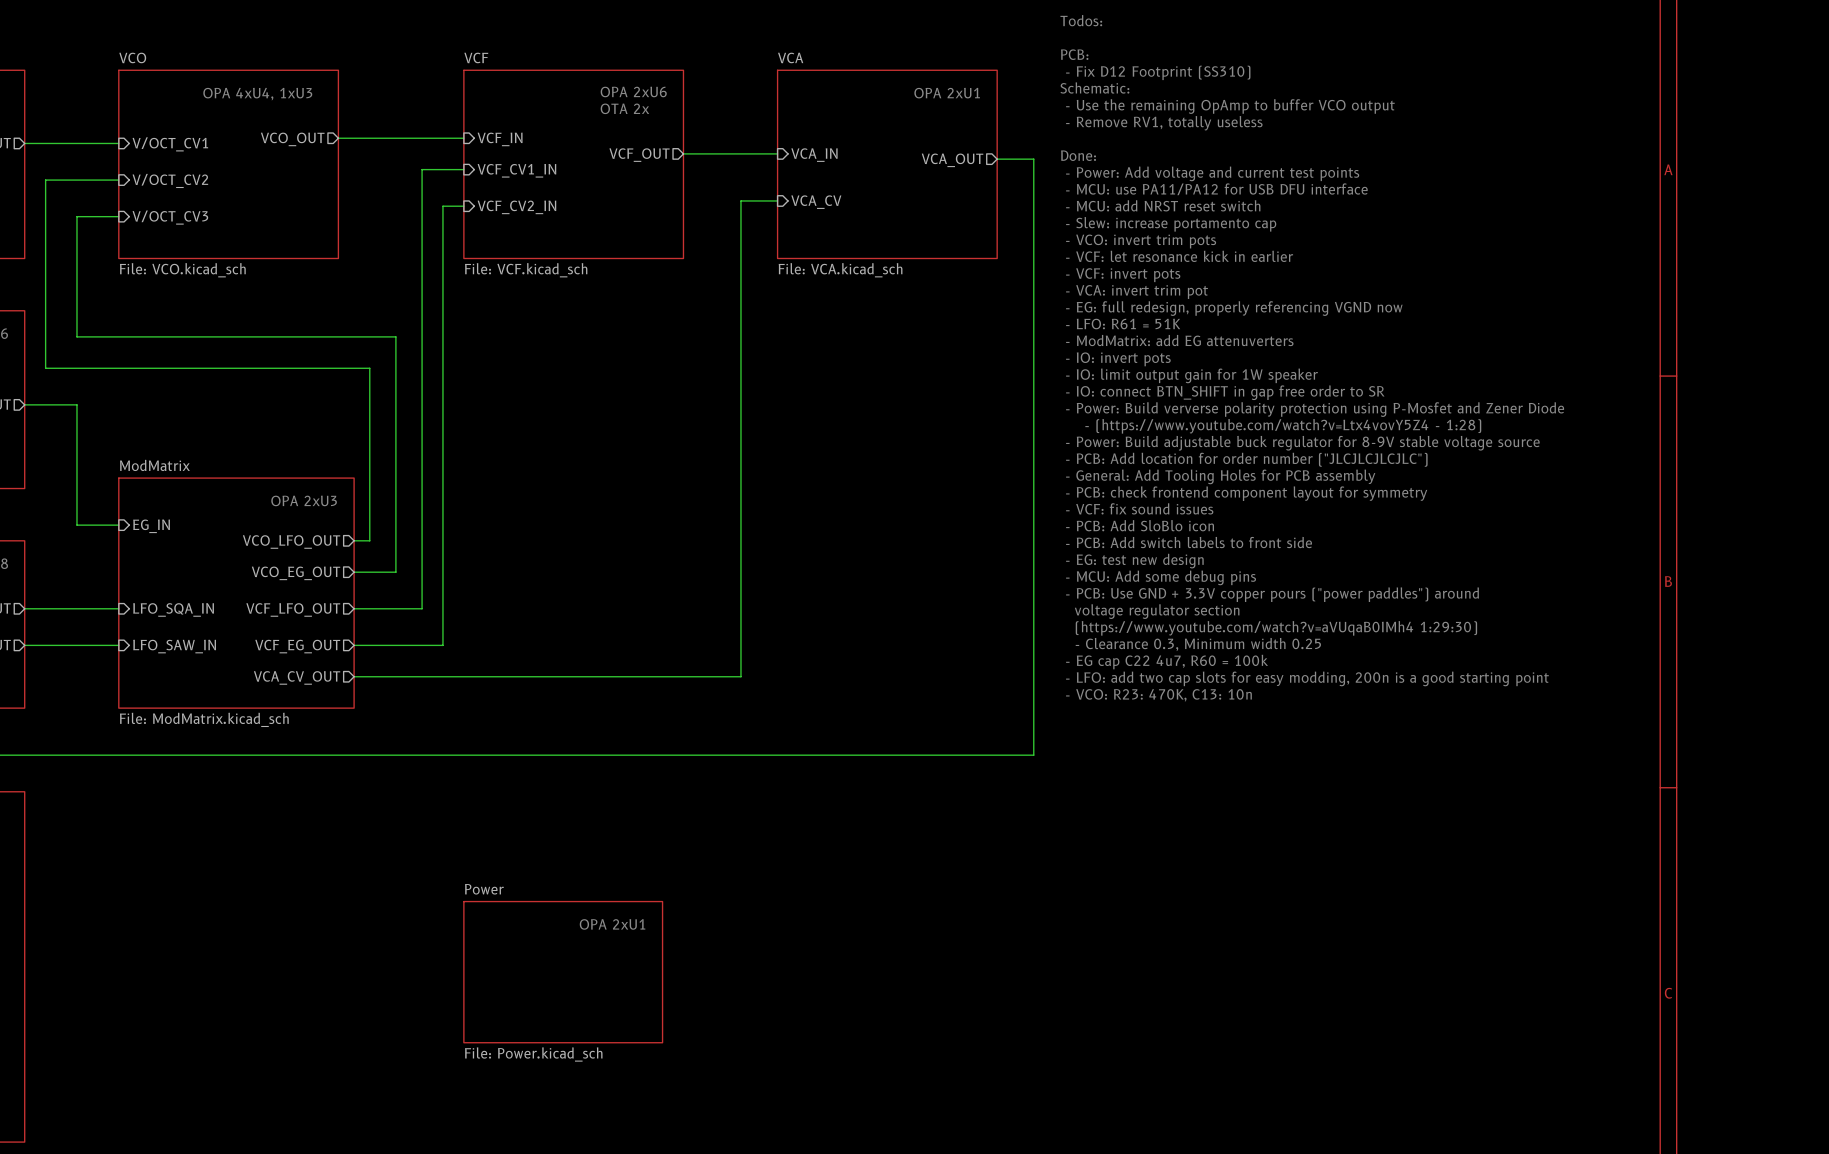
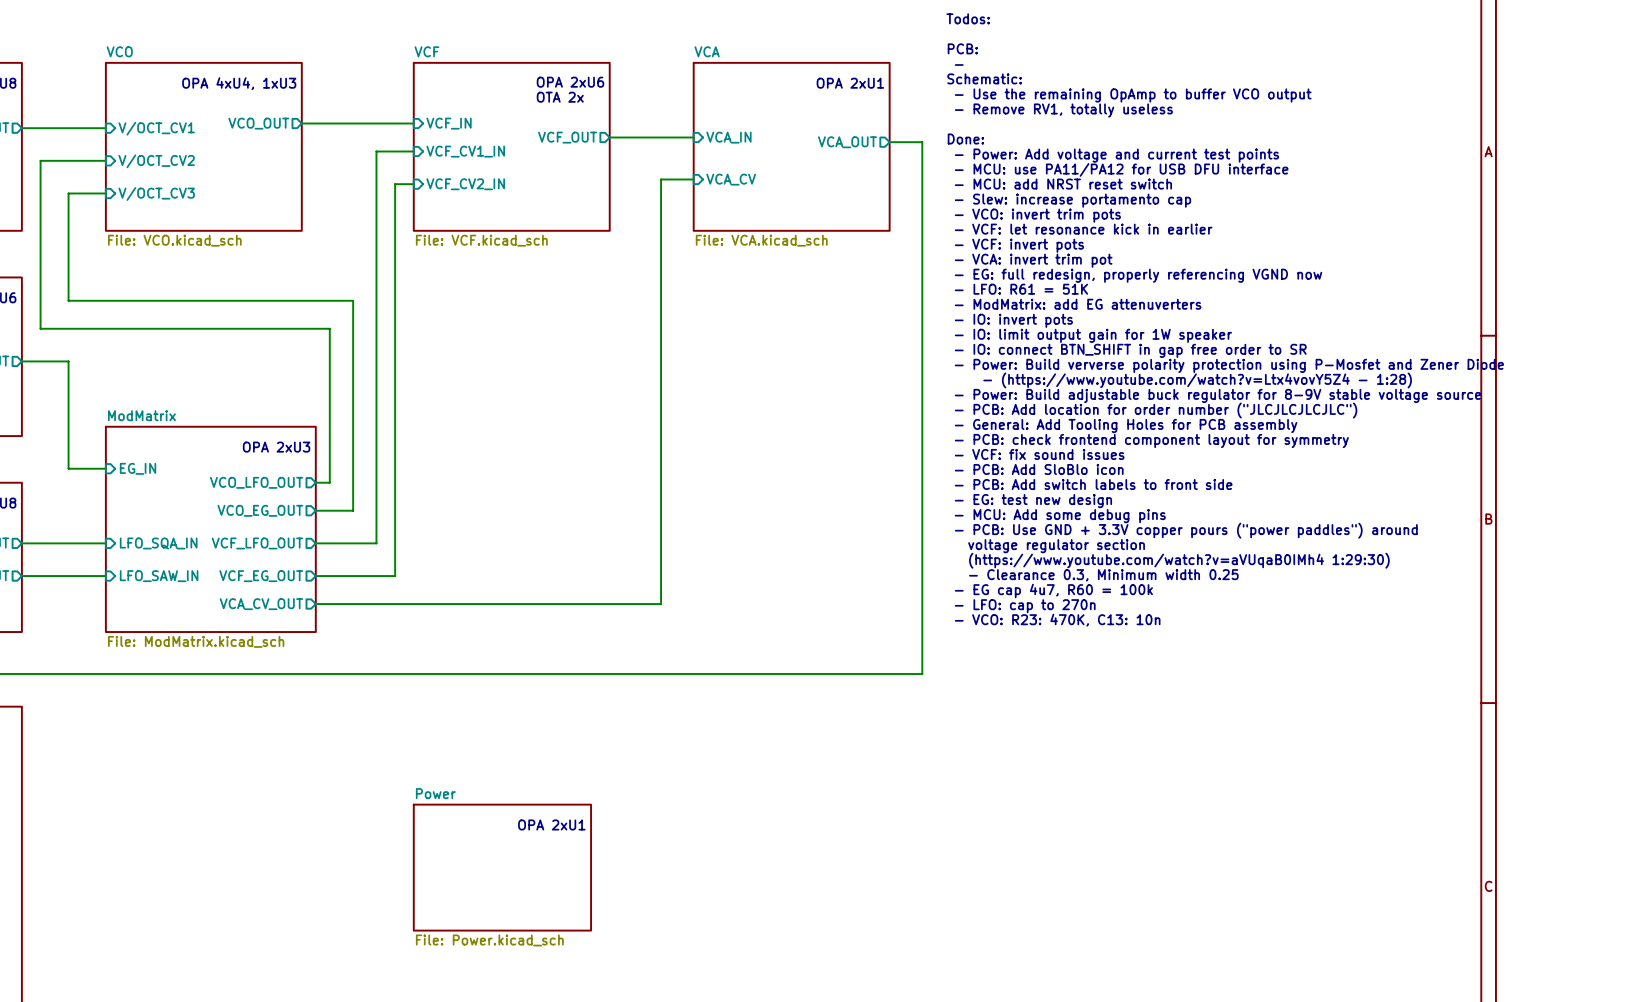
text: - Fix D12 Footprint (SS310) (1158, 72) -> - (959, 65)
text: - EG cap C22 4u7, R60 = 100k (1167, 662) -> - EG cap 4u7, R60 = 100k (1053, 591)
text: - LFO: add two cap slots for easy modding, 200n is a good starting point (1307, 678) -> - LFO: cap to 270n (1025, 606)

